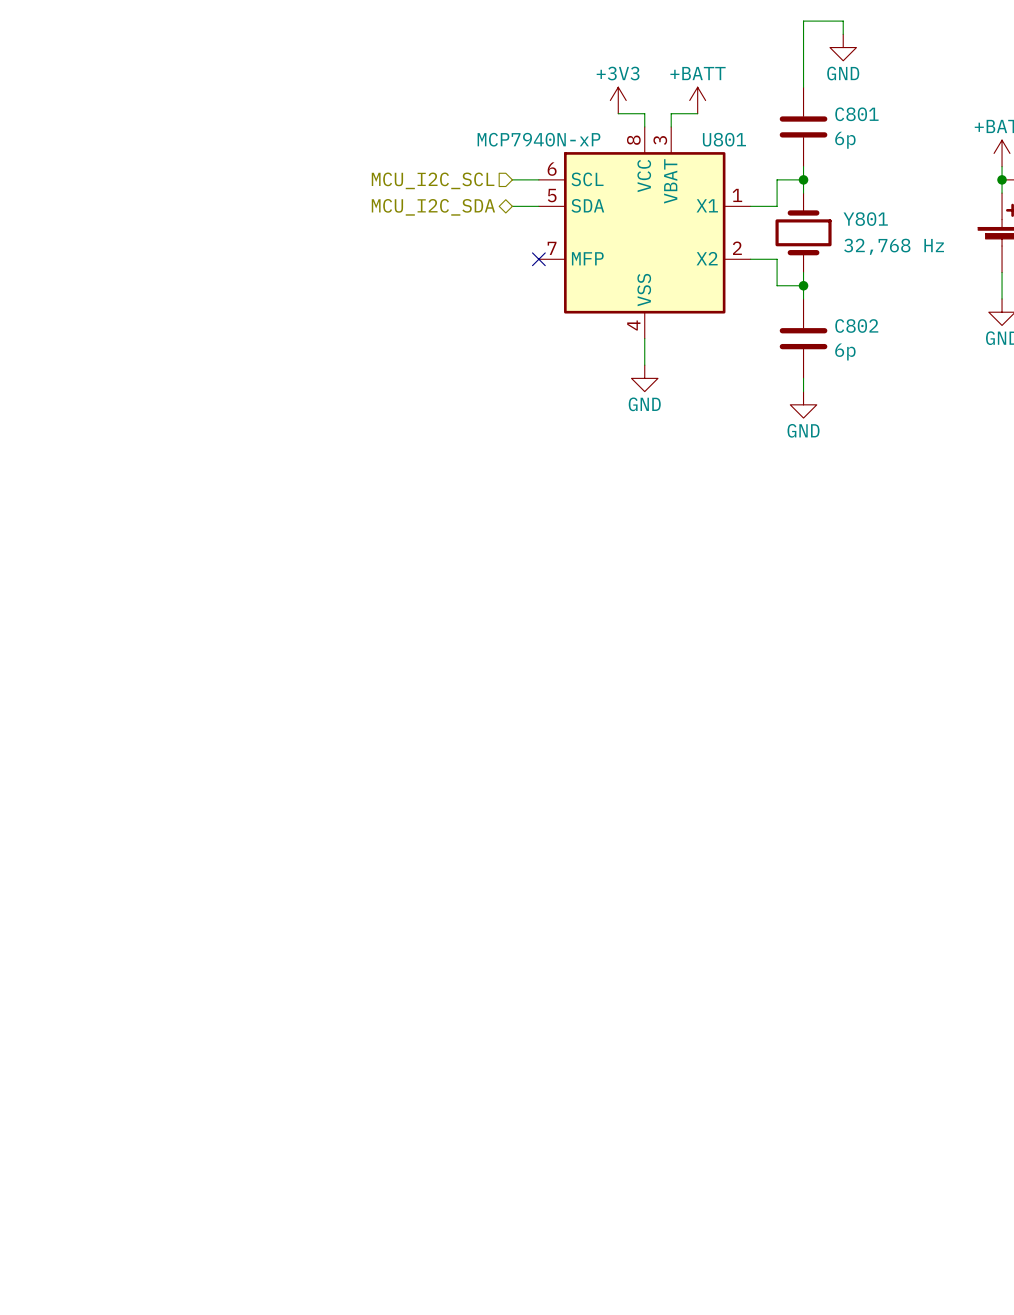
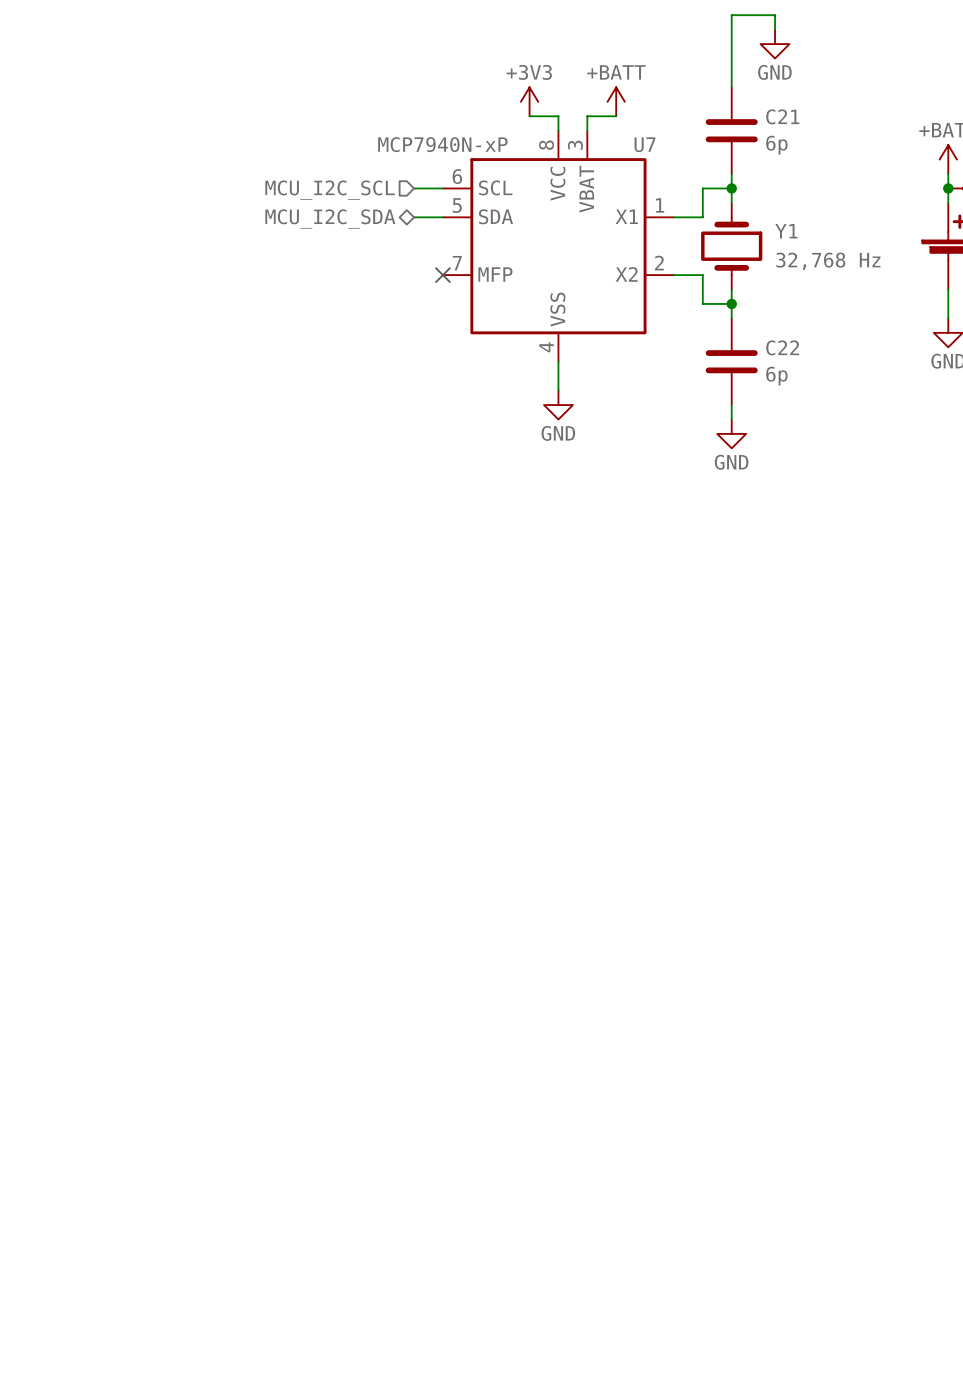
C801 name: C801 (856, 114) -> C21 (782, 116)
U801 name: U801 (724, 139) -> U7 (645, 144)
Y801 name: Y801 (865, 219) -> Y1 (786, 231)
C802 name: C802 (856, 326) -> C22 (782, 347)

